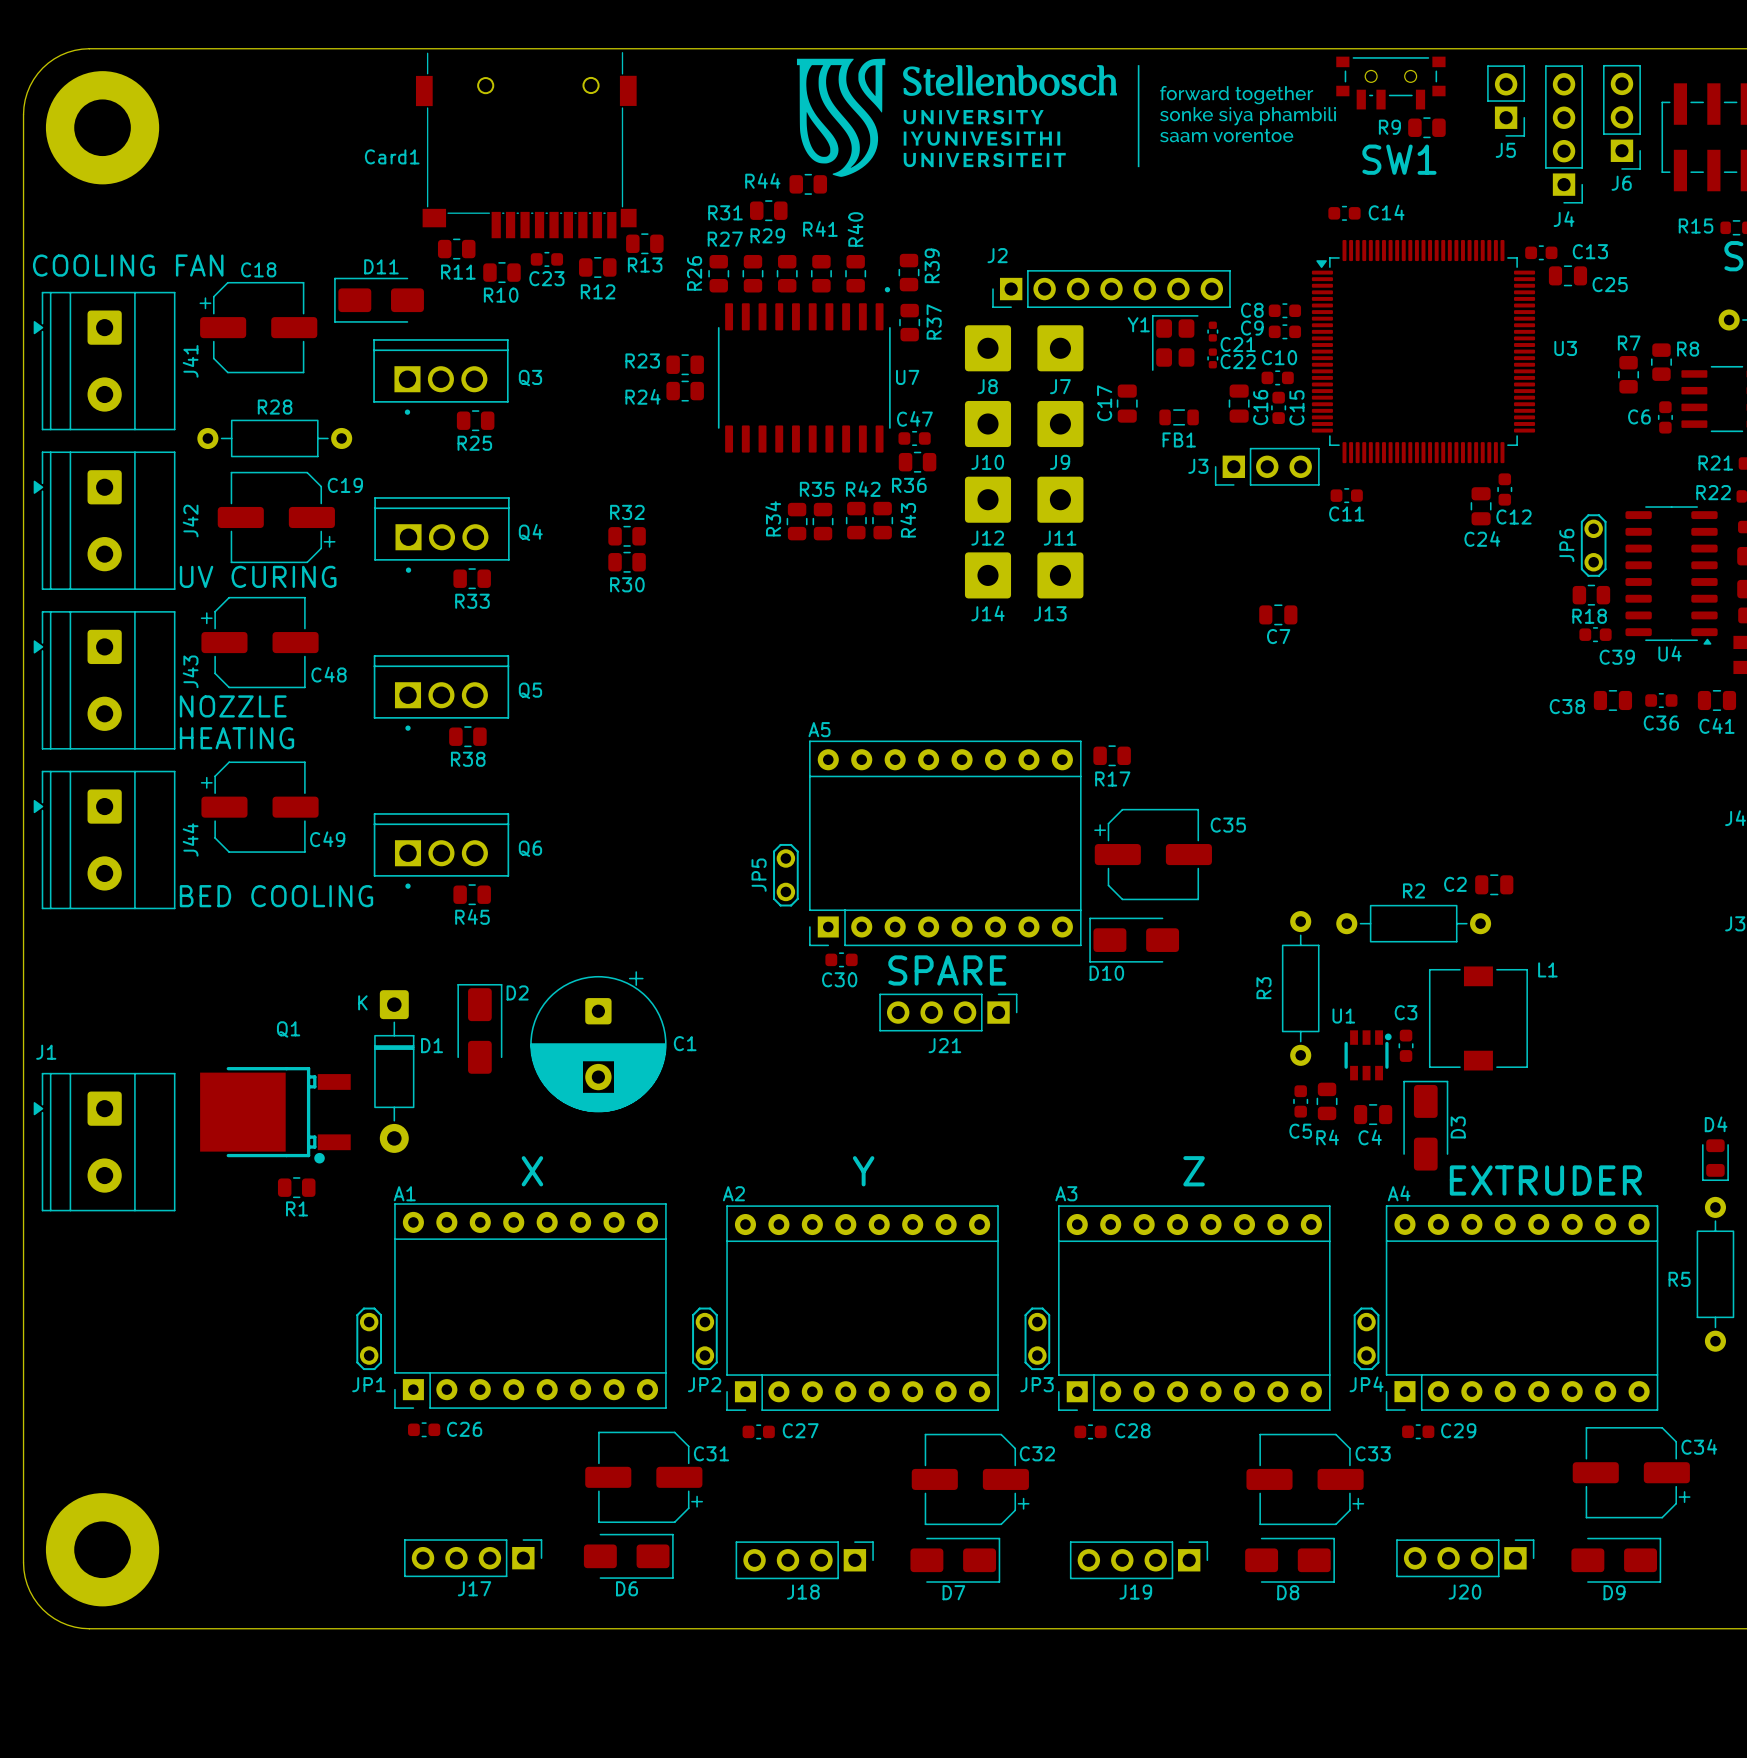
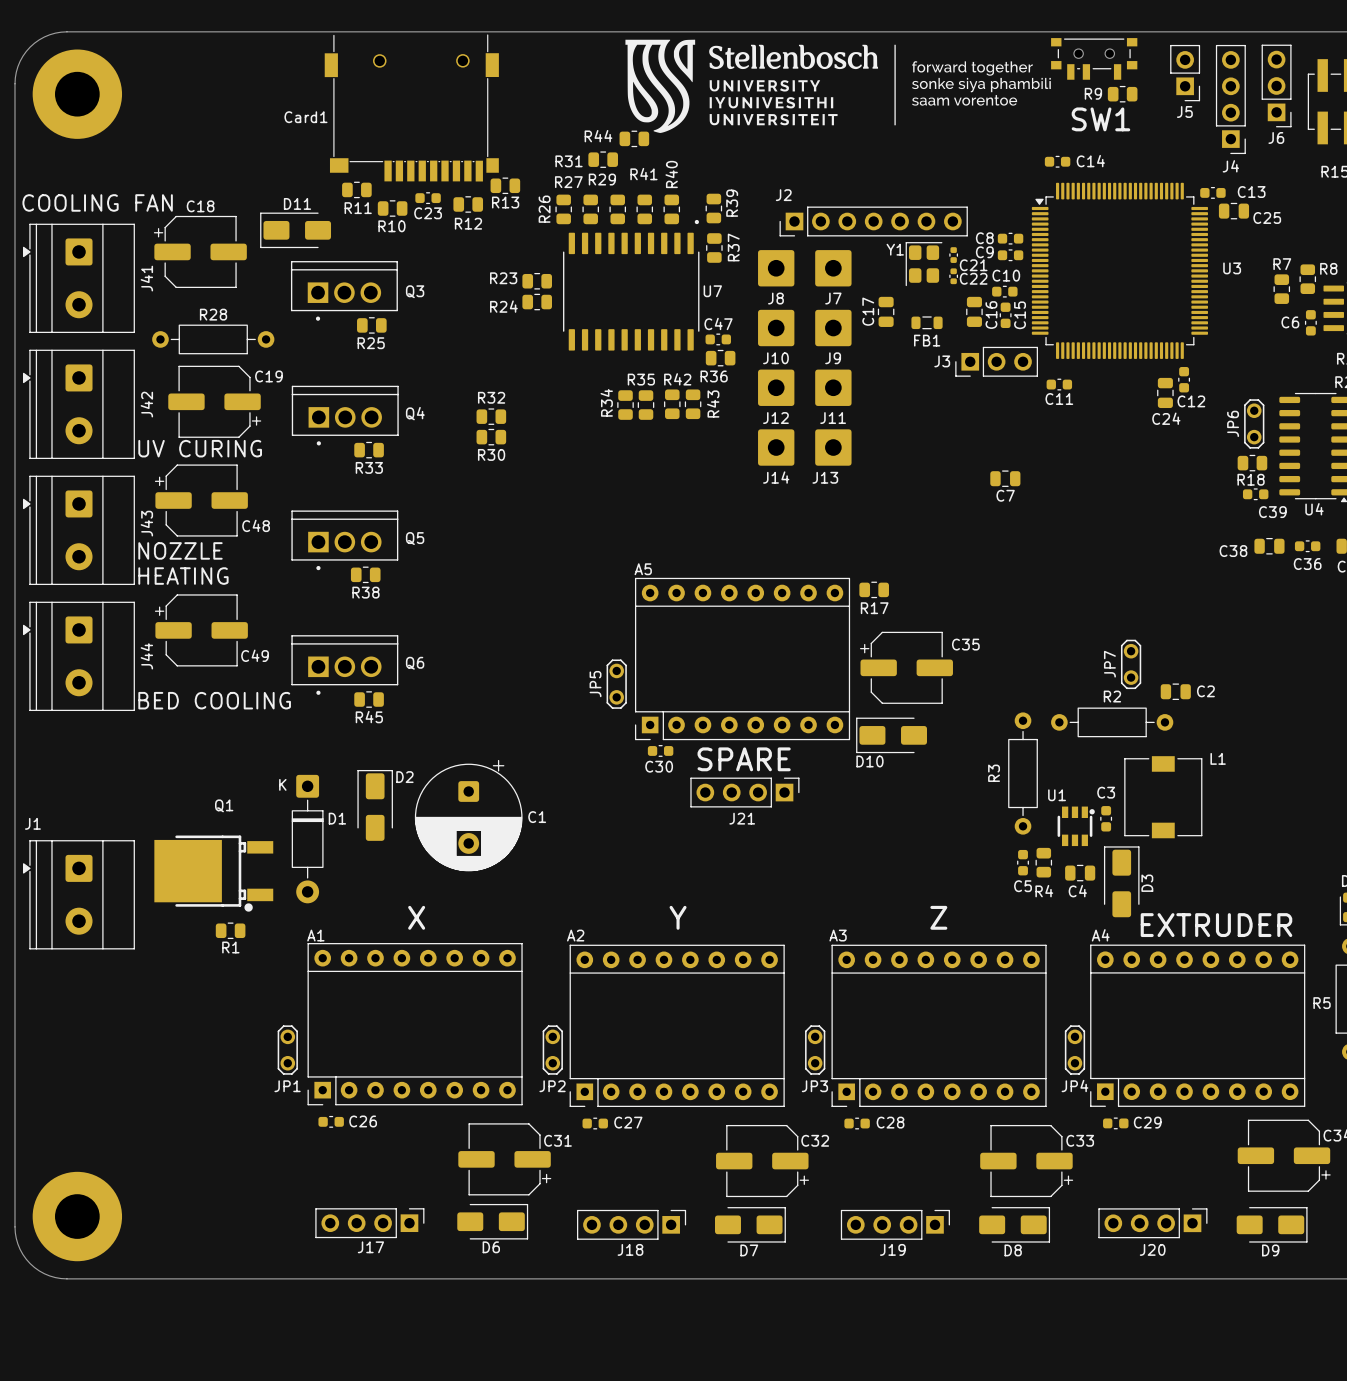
JP7: none -> (1131, 664)
C2 name position: C2 (1455, 884) -> C2 (1205, 691)

